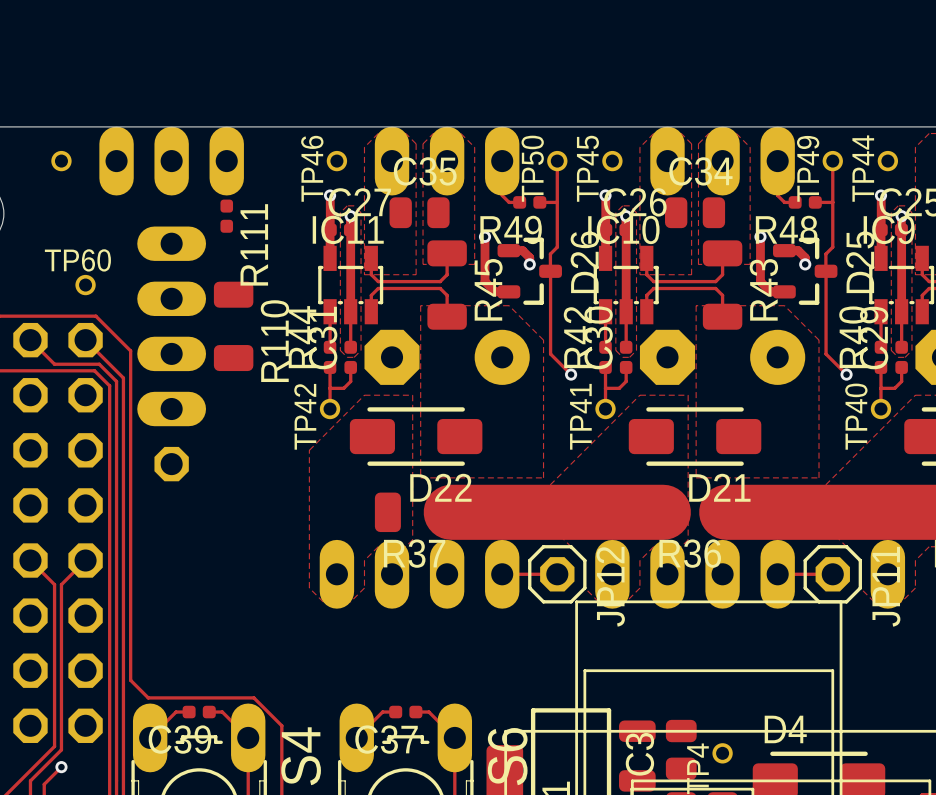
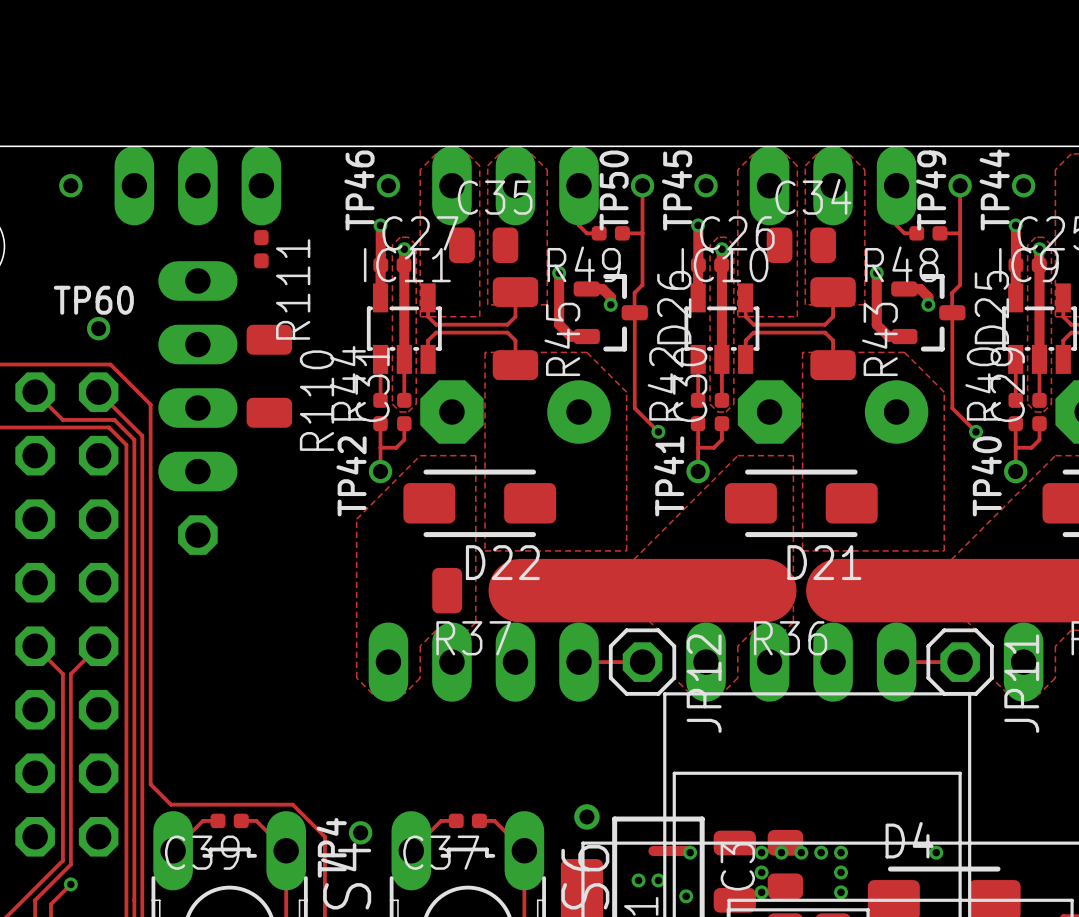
via: none -> (586, 816)
track: none -> (653, 850) (688, 850) (690, 852)
via: none -> (690, 852)
via: none -> (761, 852)
via: none -> (781, 852)
via: none -> (801, 852)
via: none -> (821, 852)
via: none -> (841, 852)
via: none -> (936, 852)
TP4 position: (722, 753) -> (360, 832)
via: none -> (761, 872)
via: none -> (841, 872)
via: none -> (638, 880)
via: none -> (658, 880)
via: none -> (761, 892)
via: none -> (841, 892)
via: none -> (686, 896)

